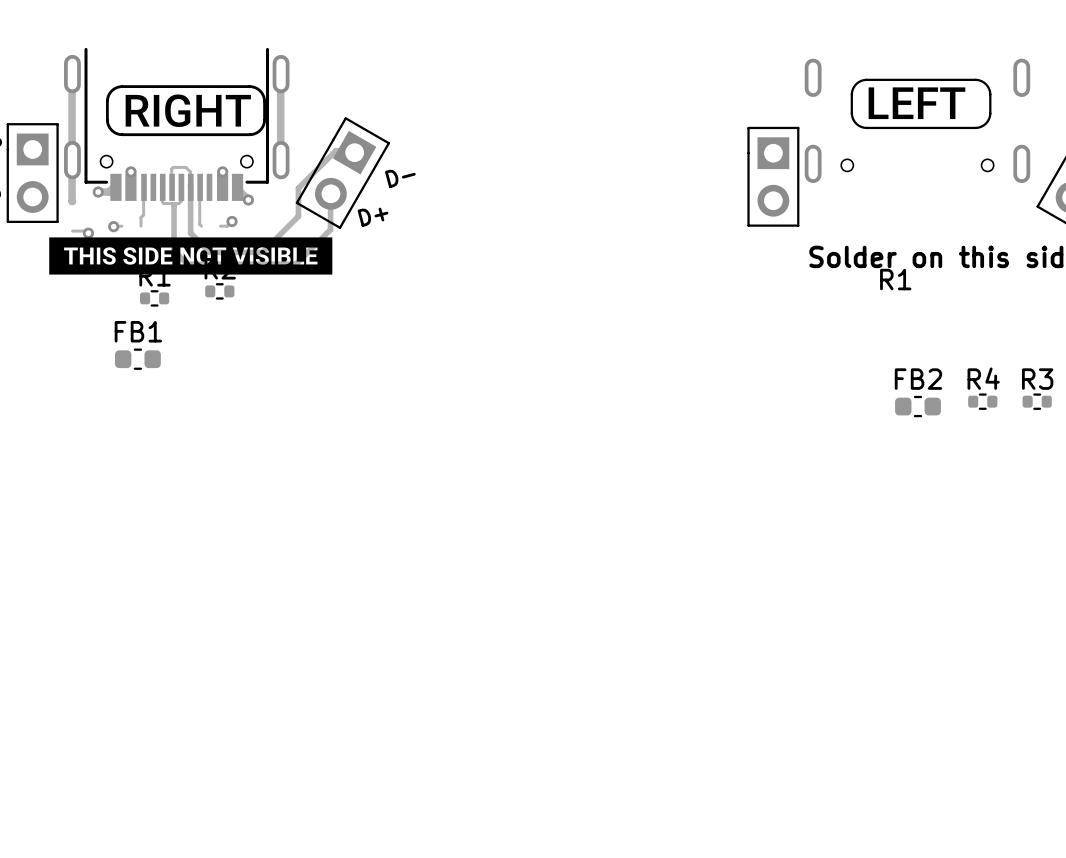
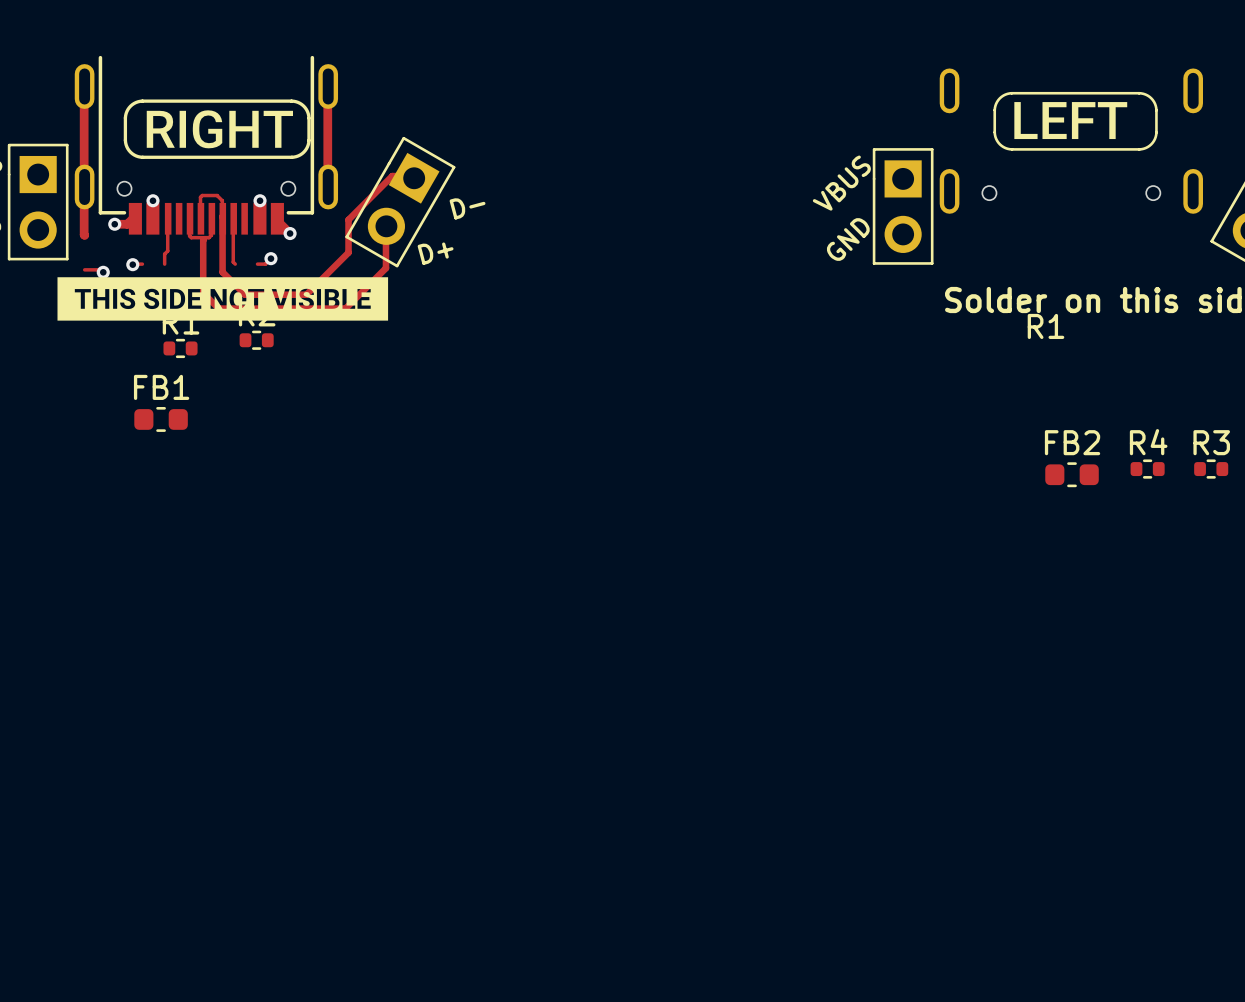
text: none -> VBUS (841, 183)
text: none -> GND (848, 239)

